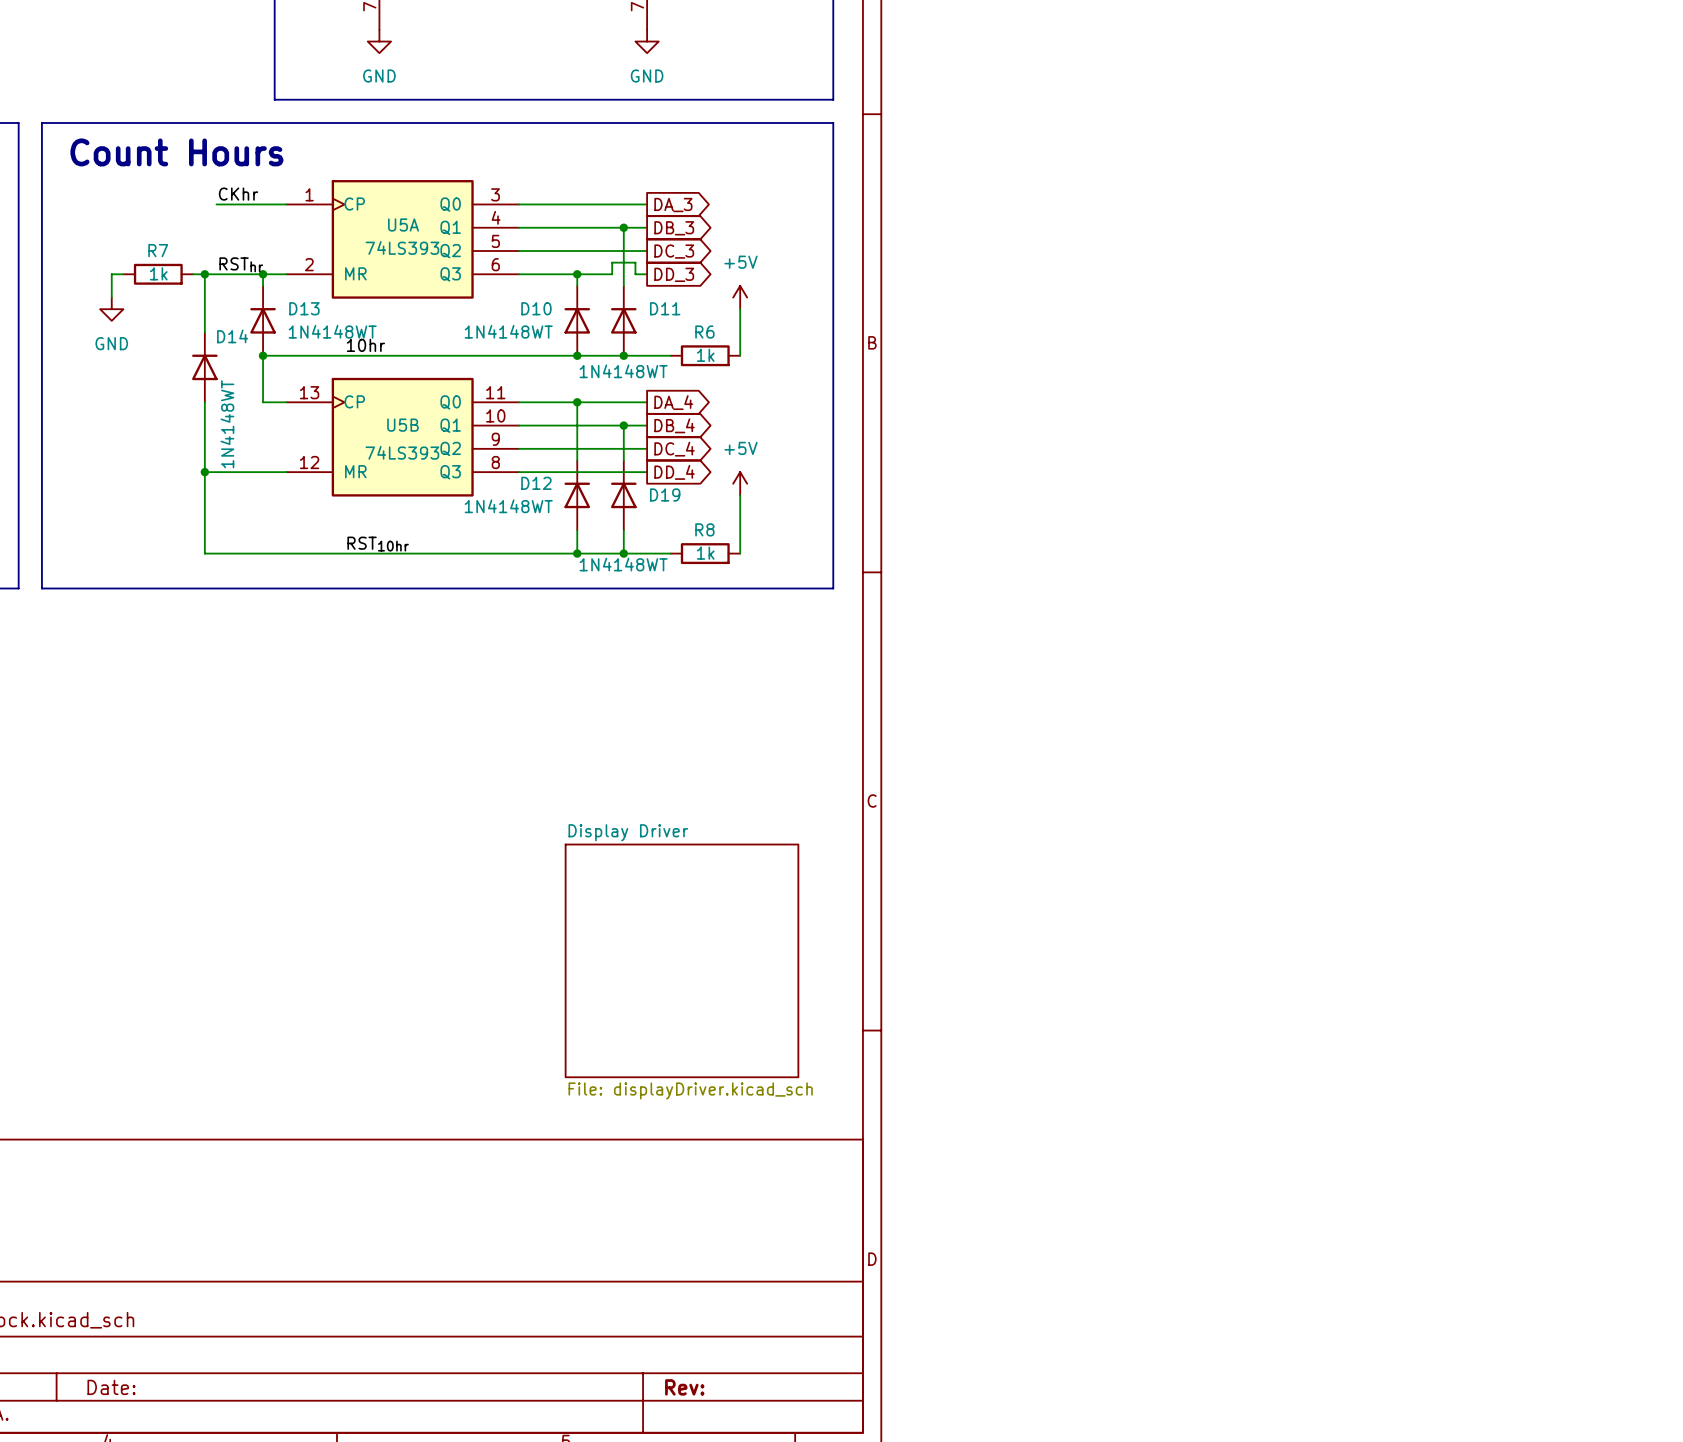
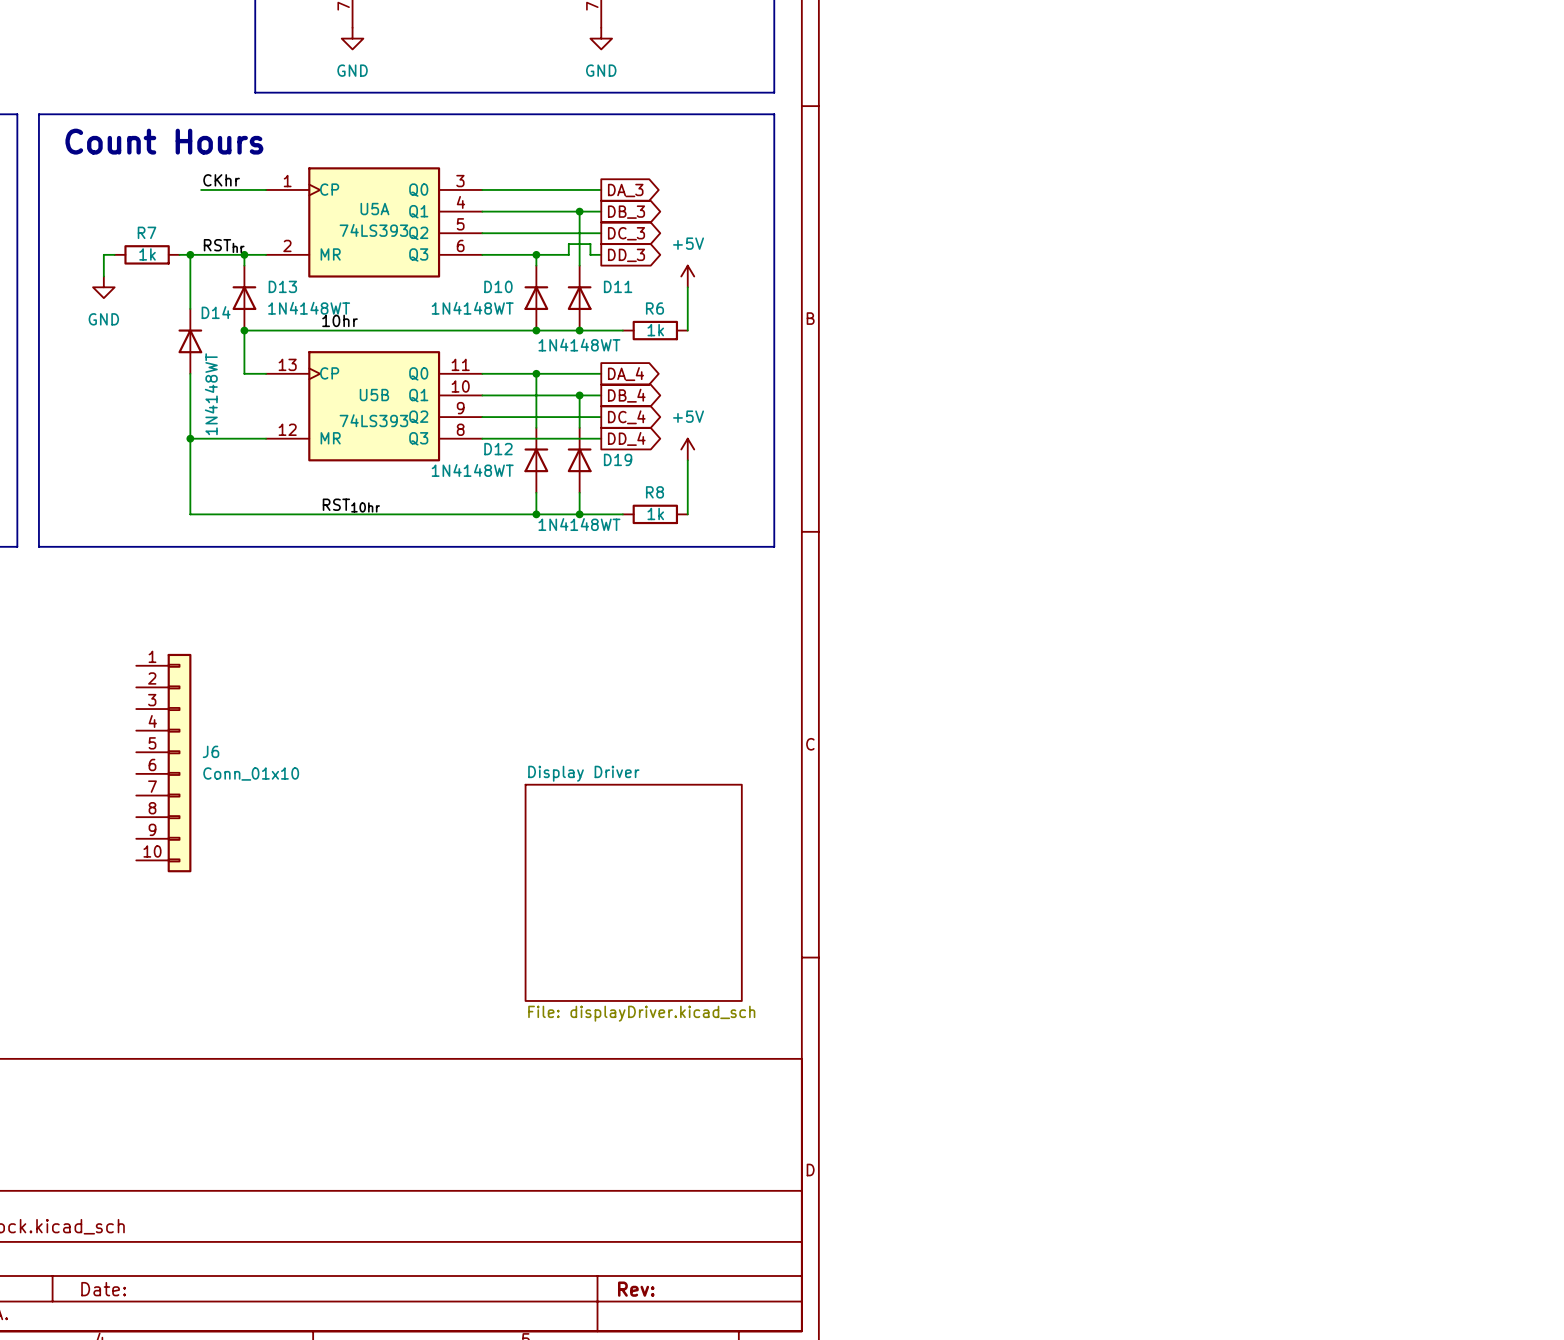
J6: none -> Conn_01x10 (163, 763)

